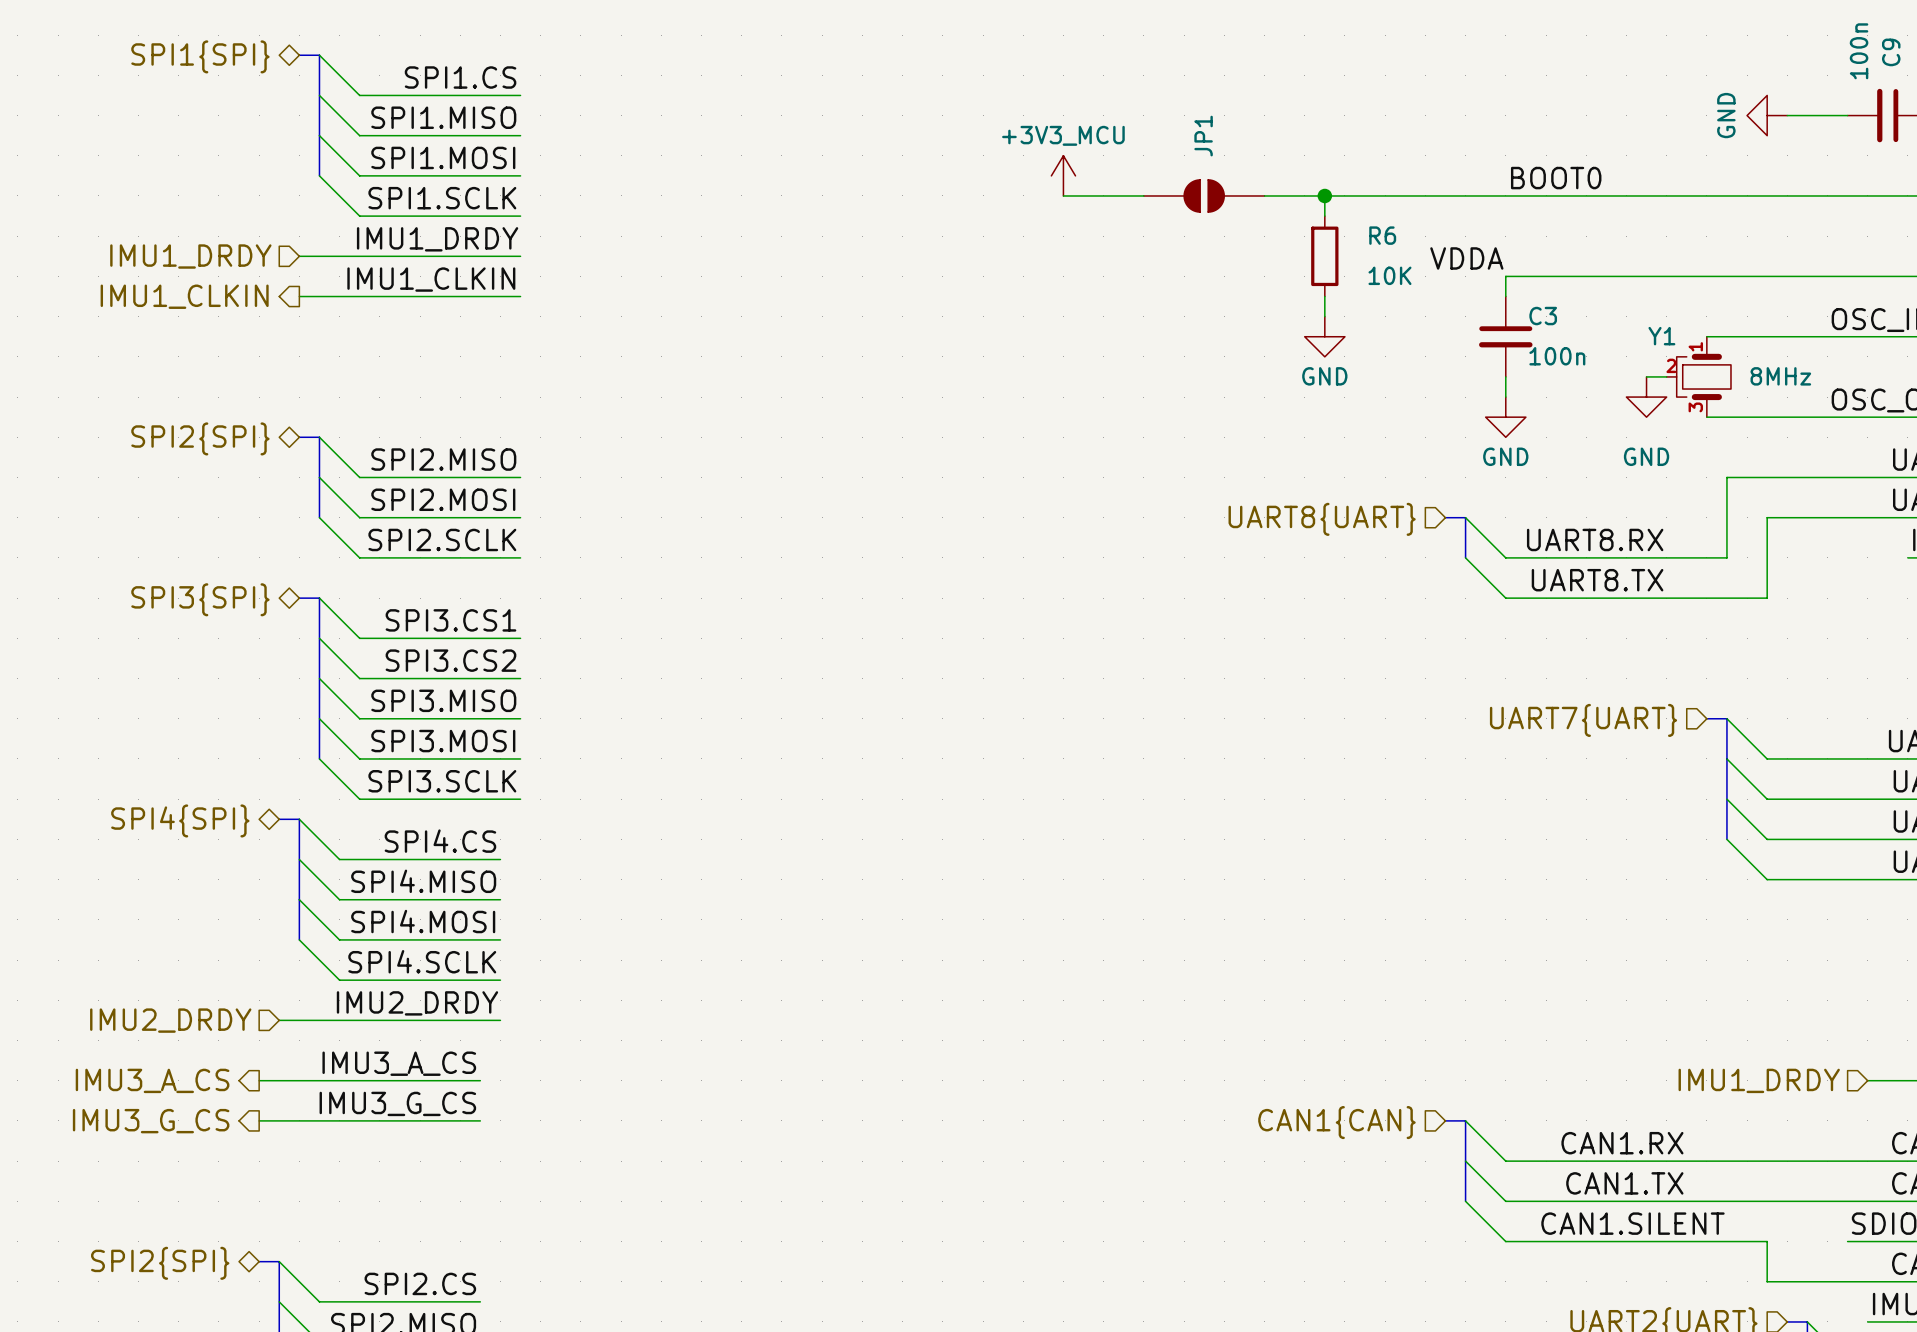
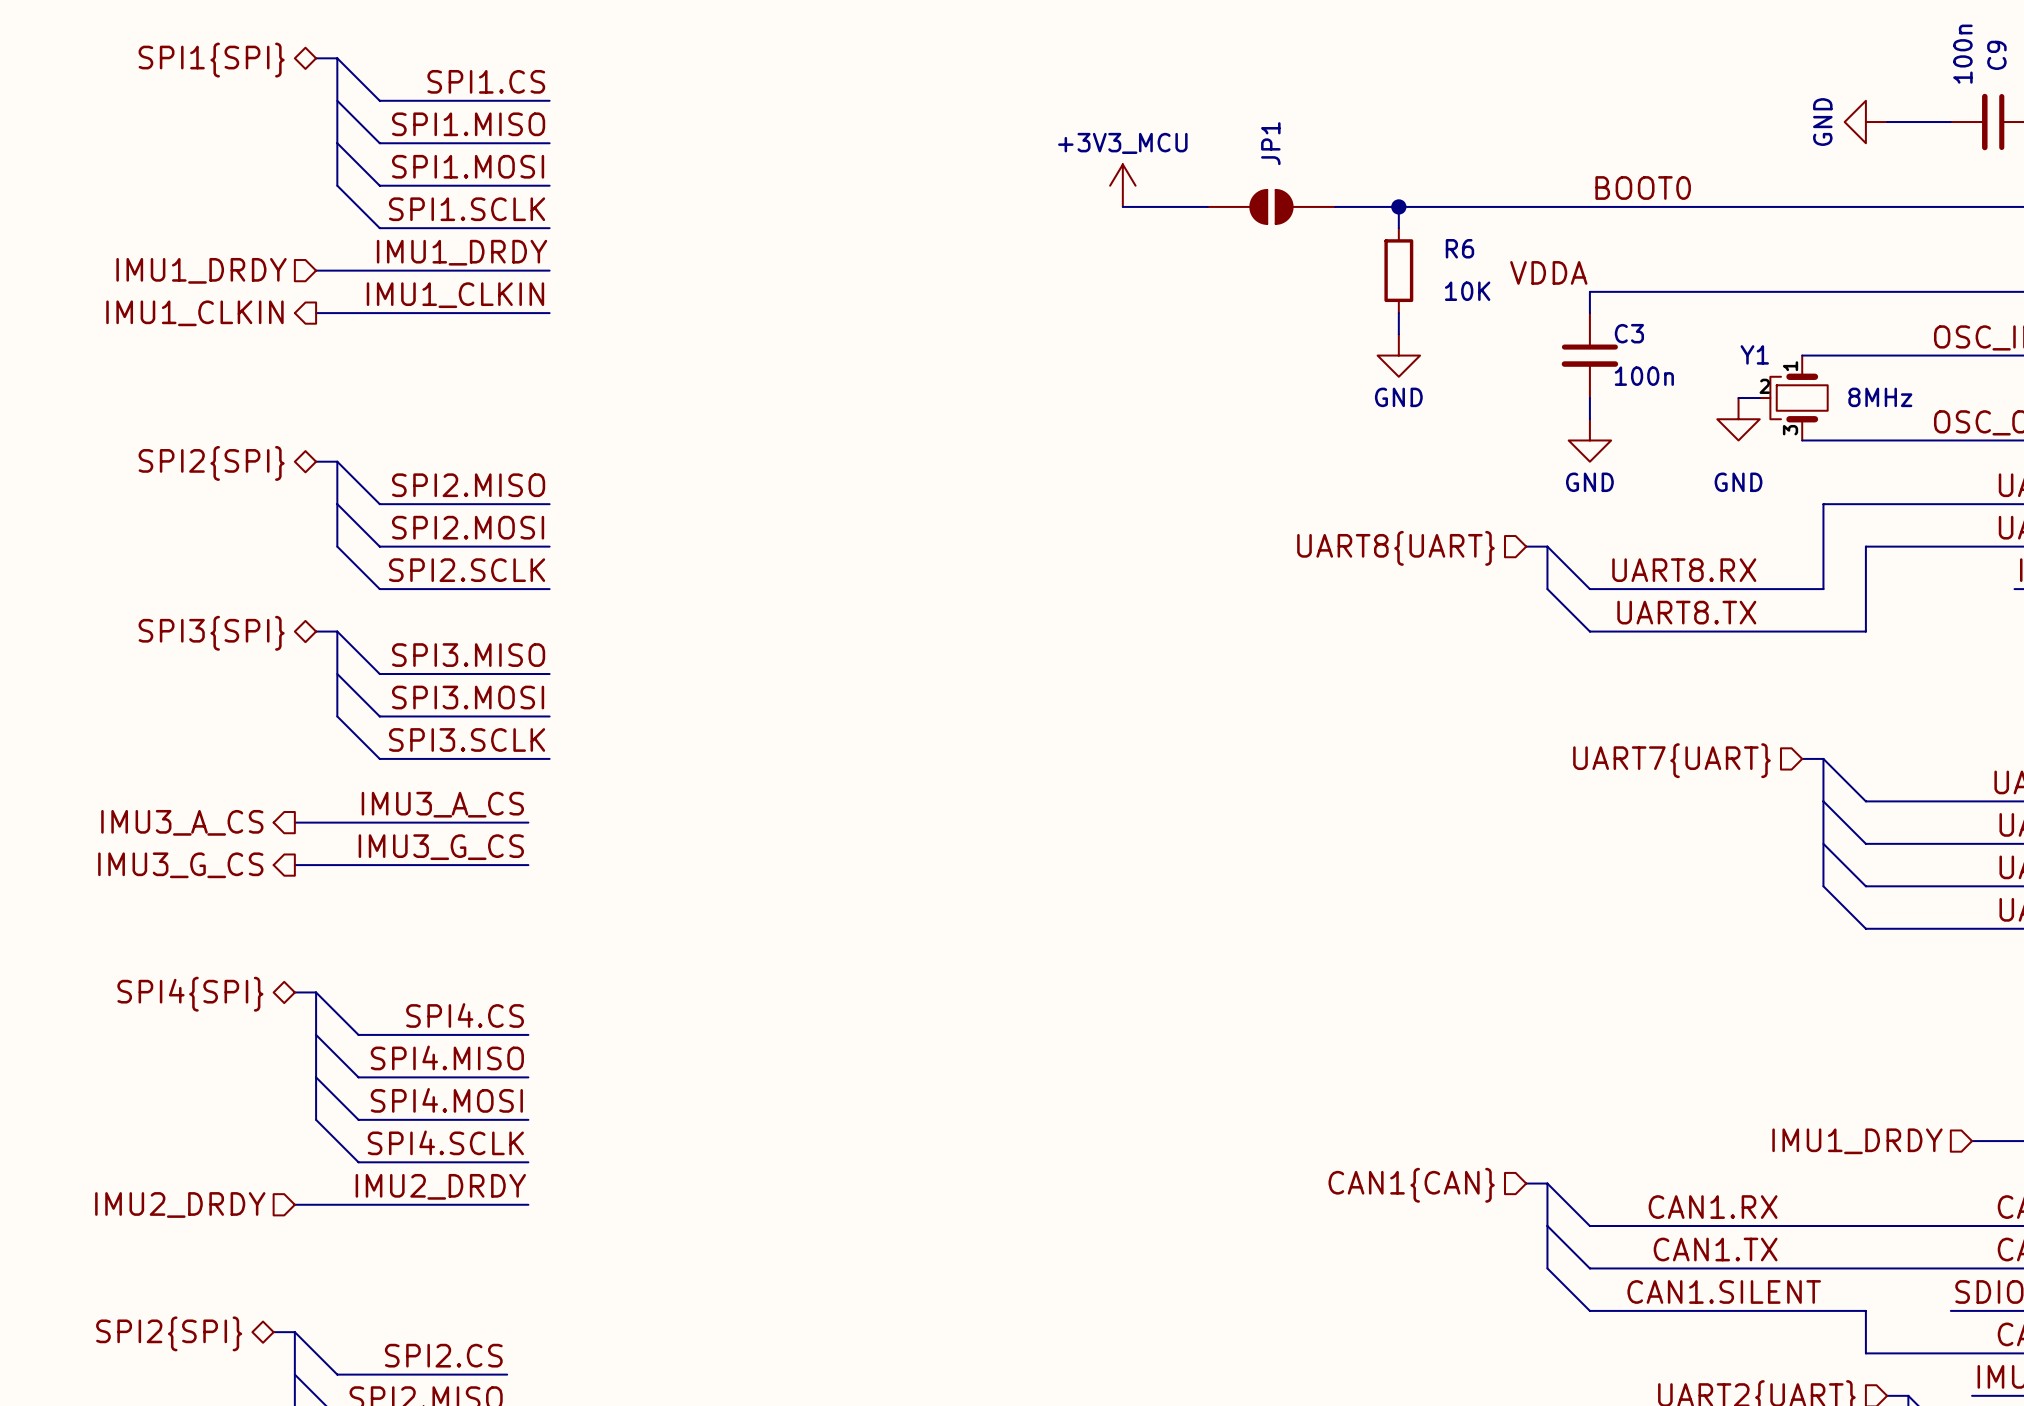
label: SPI3.CS1 (450, 620) -> SPI3.MISO (468, 655)
label: SPI3.CS2 (450, 660) -> SPI3.MOSI (468, 697)
bus: (319, 678) (319, 758) -> none
label: SPI3.MISO (443, 700) -> SPI3.SCLK (467, 739)
wire: (319, 718) (359, 758) (520, 758) -> none
label: SPI3.MOSI (443, 741) -> none
wire: (319, 758) (359, 799) (520, 799) -> none
label: SPI3.SCLK (442, 781) -> none
bus: (279, 819) (299, 819) (299, 939) -> (294, 992) (316, 992) (316, 1119)
wire: (299, 819) (339, 859) (500, 859) -> none
hierarchical label shape: bidirectional (180, 820) -> output (180, 865)
hierarchical label: SPI4{SPI} (180, 820) -> IMU3_G_CS (180, 865)
label: SPI4.CS (440, 841) -> none
wire: (299, 859) (339, 899) (500, 899) -> (316, 1077) (358, 1119) (528, 1119)
label: SPI4.MISO (423, 881) -> none
wire: (299, 899) (339, 939) (500, 939) -> (316, 1119) (358, 1162) (528, 1162)
label position: SPI4.MOSI (423, 921) -> SPI4.MOSI (446, 1100)
hierarchical label: none -> SPI4{SPI} (190, 994)
label: SPI4.SCLK (422, 961) -> SPI4.CS (465, 1015)
label: IMU2_DRDY (417, 1003) -> SPI4.MISO (447, 1057)
hierarchical label position: IMU2_DRDY (170, 1020) -> IMU2_DRDY (180, 1204)
wire: (279, 1020) (339, 1020) -> (316, 1034) (358, 1077)
label position: IMU3_A_CS (399, 1063) -> IMU3_A_CS (442, 804)
hierarchical label position: IMU3_A_CS (152, 1080) -> IMU3_A_CS (182, 822)
wire: (259, 1080) (480, 1080) -> (294, 822) (528, 822)
label: none -> SPI4.SCLK (445, 1142)
label position: IMU3_G_CS (397, 1103) -> IMU3_G_CS (441, 847)
wire: (259, 1120) (480, 1120) -> (294, 865) (528, 865)
hierarchical label: IMU3_G_CS (151, 1121) -> none
label: none -> IMU2_DRDY (440, 1186)
wire: none -> (294, 1204) (528, 1204)

